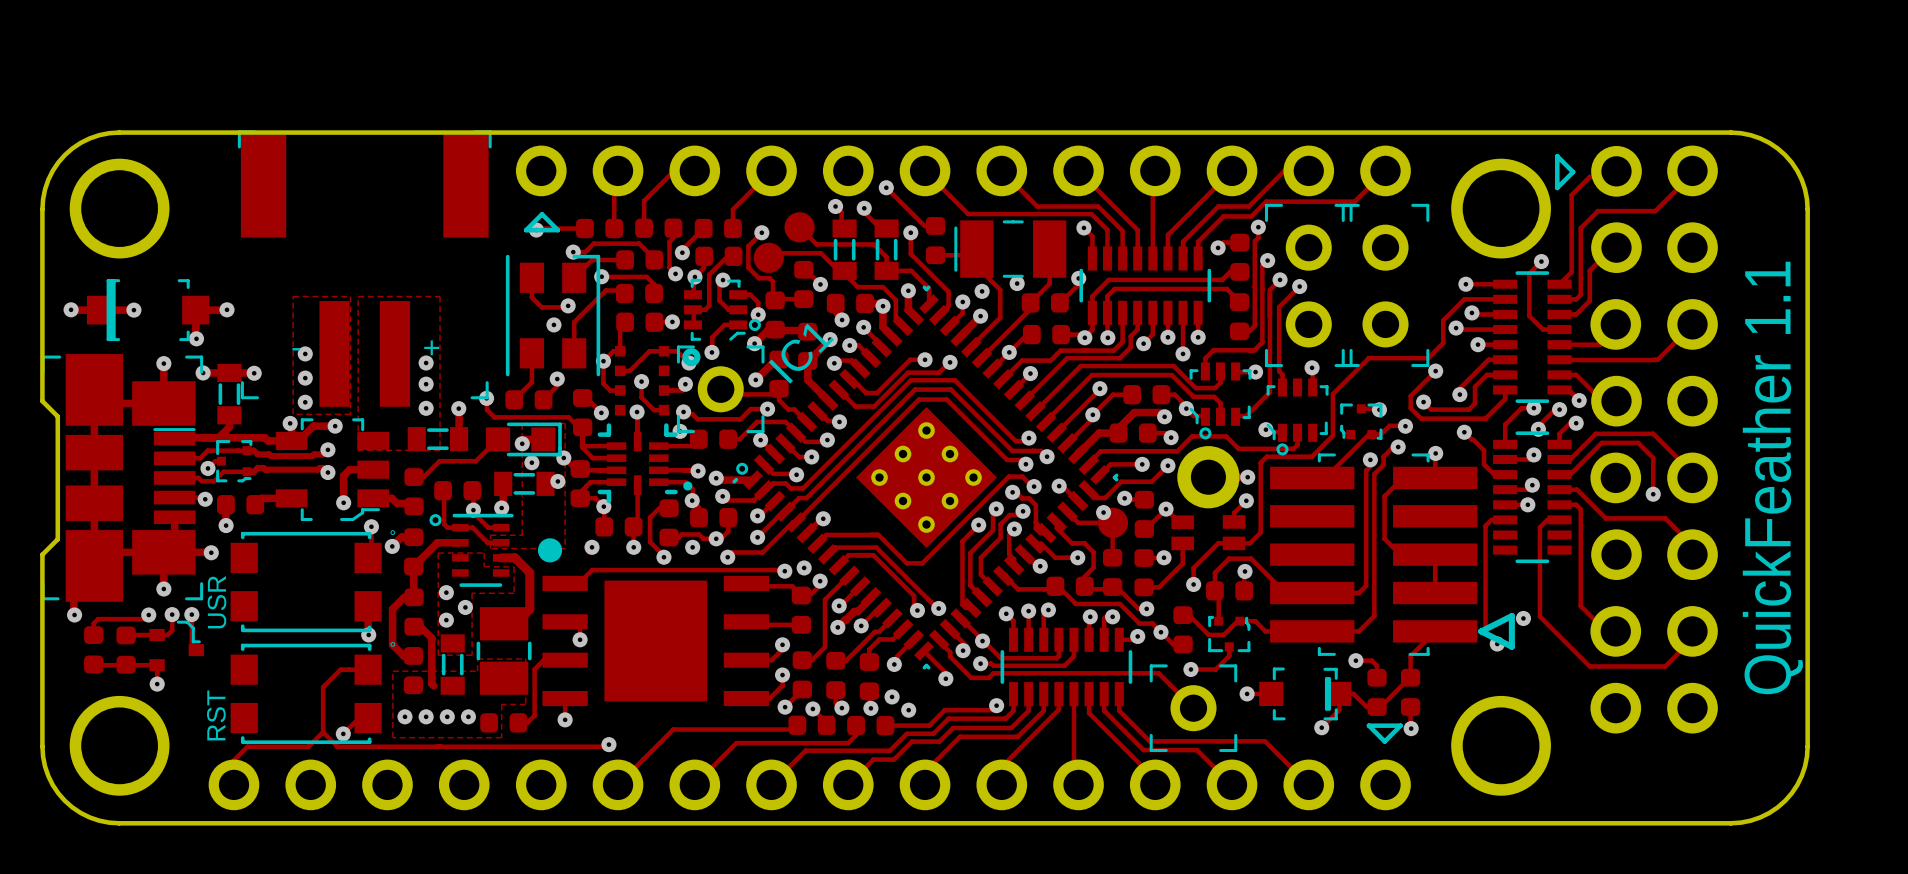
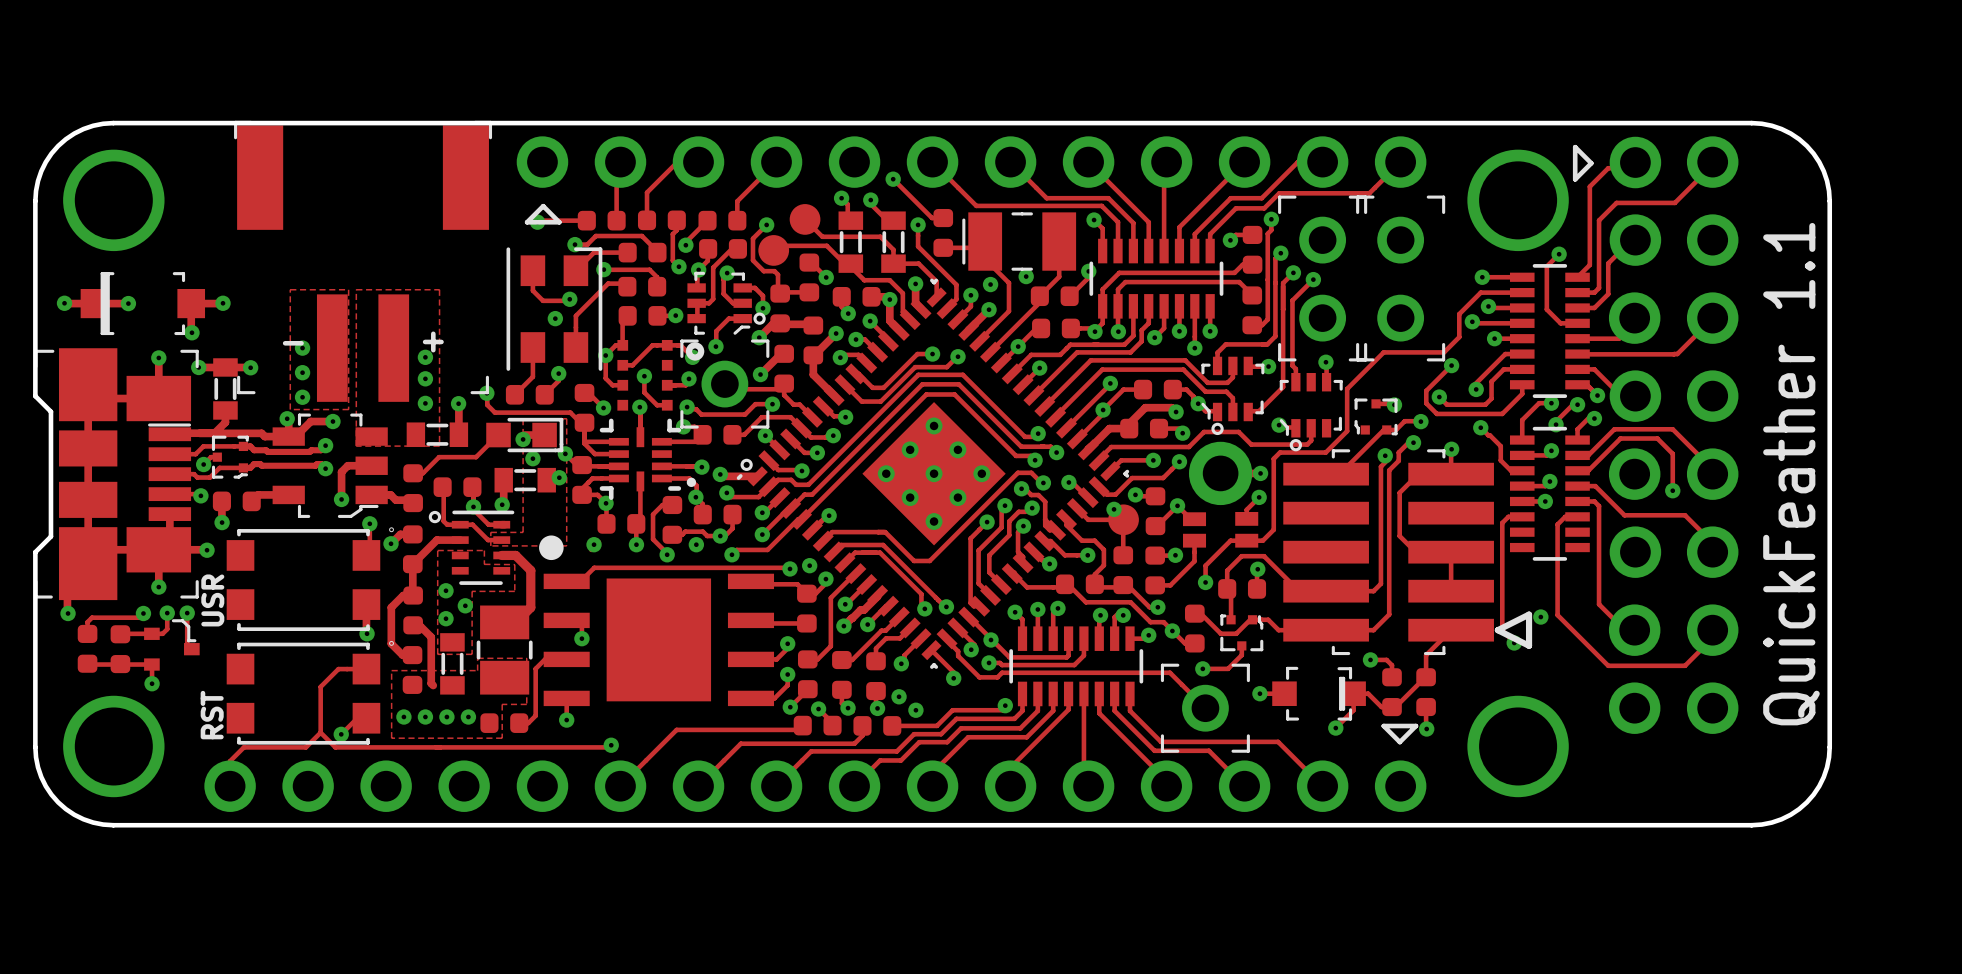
IC1 name: IC1 (801, 353) -> none

